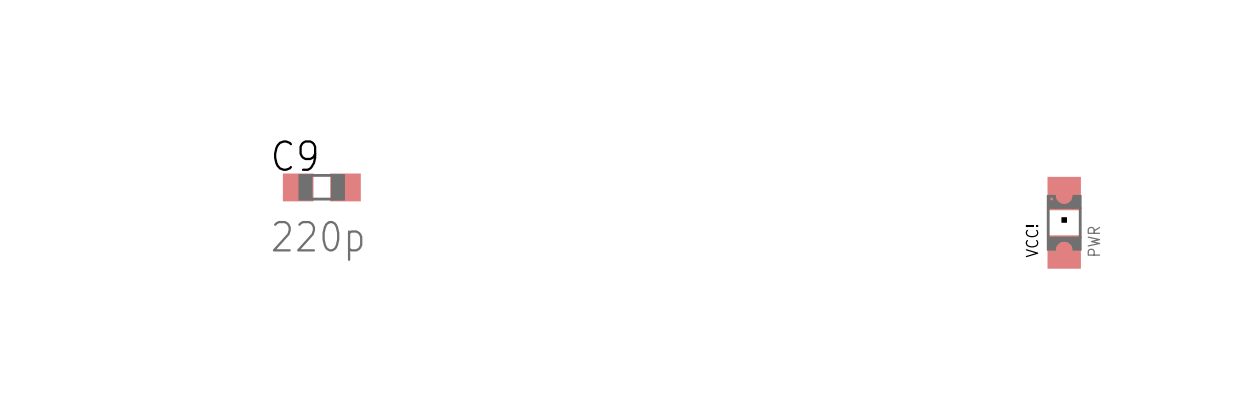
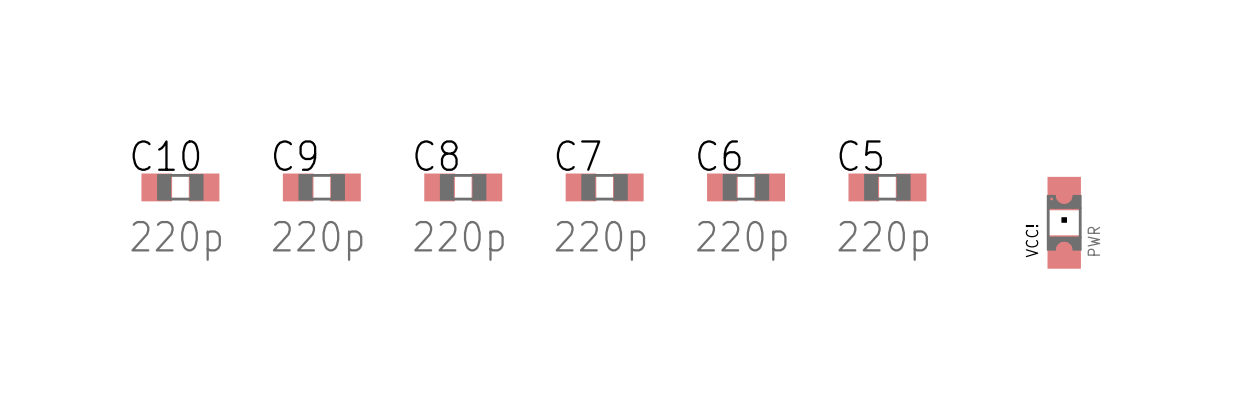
C10: none -> 220p (180, 187)
C8: none -> 220p (463, 187)
C7: none -> 220p (604, 187)
C6: none -> 220p (746, 187)
C5: none -> 220p (887, 187)

